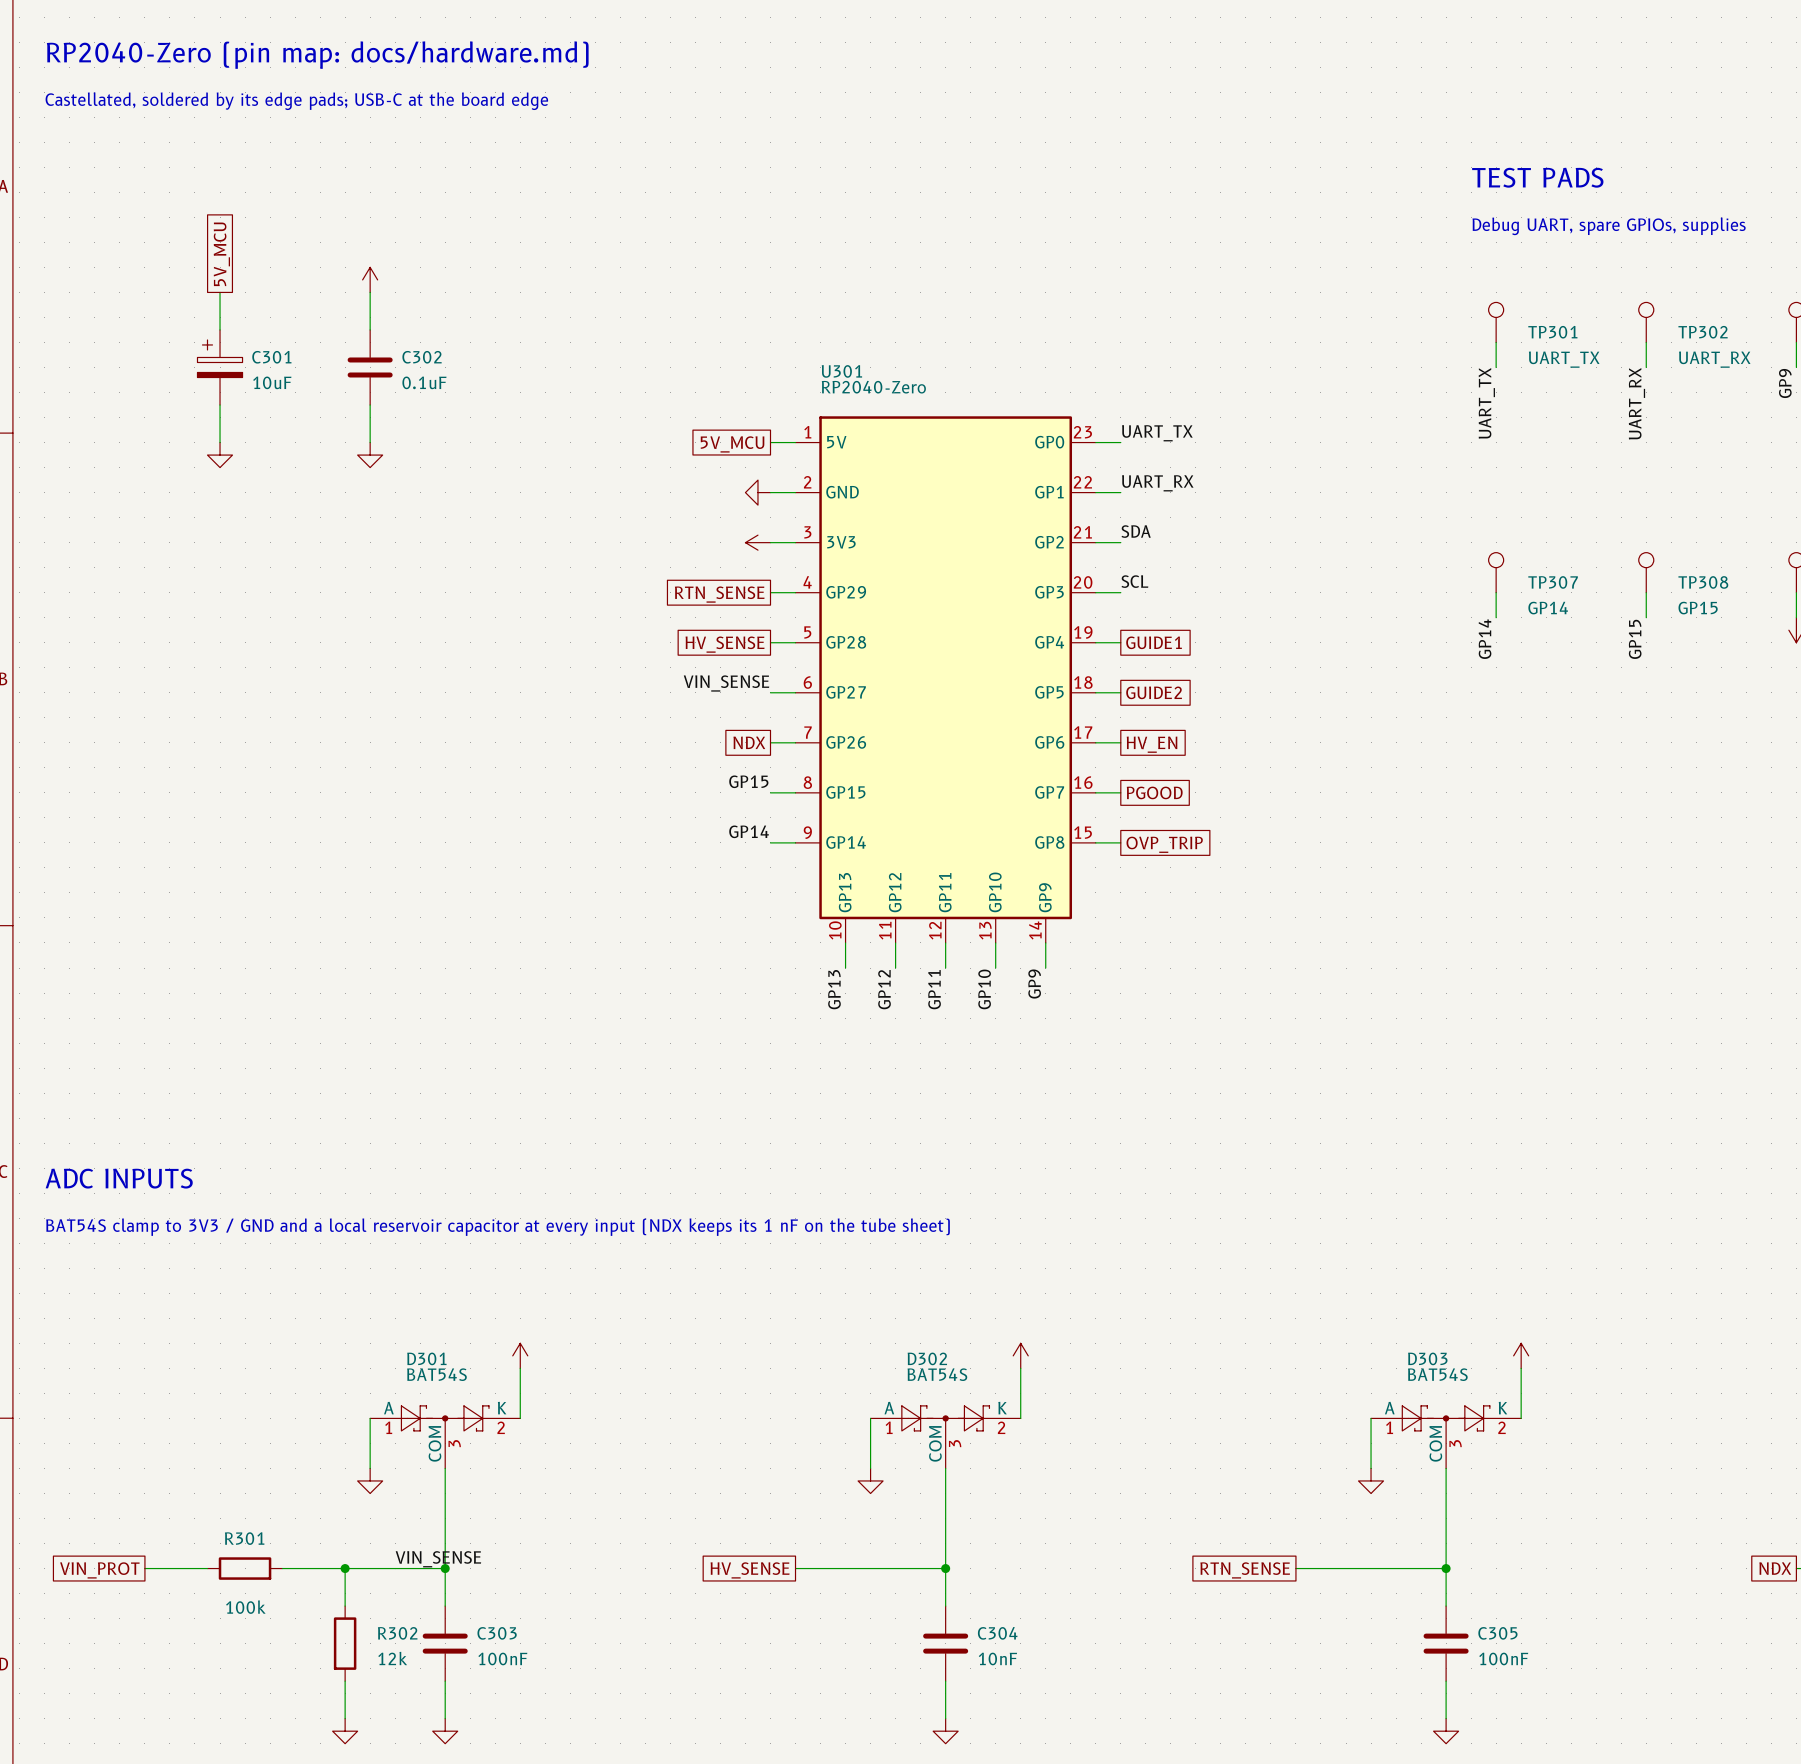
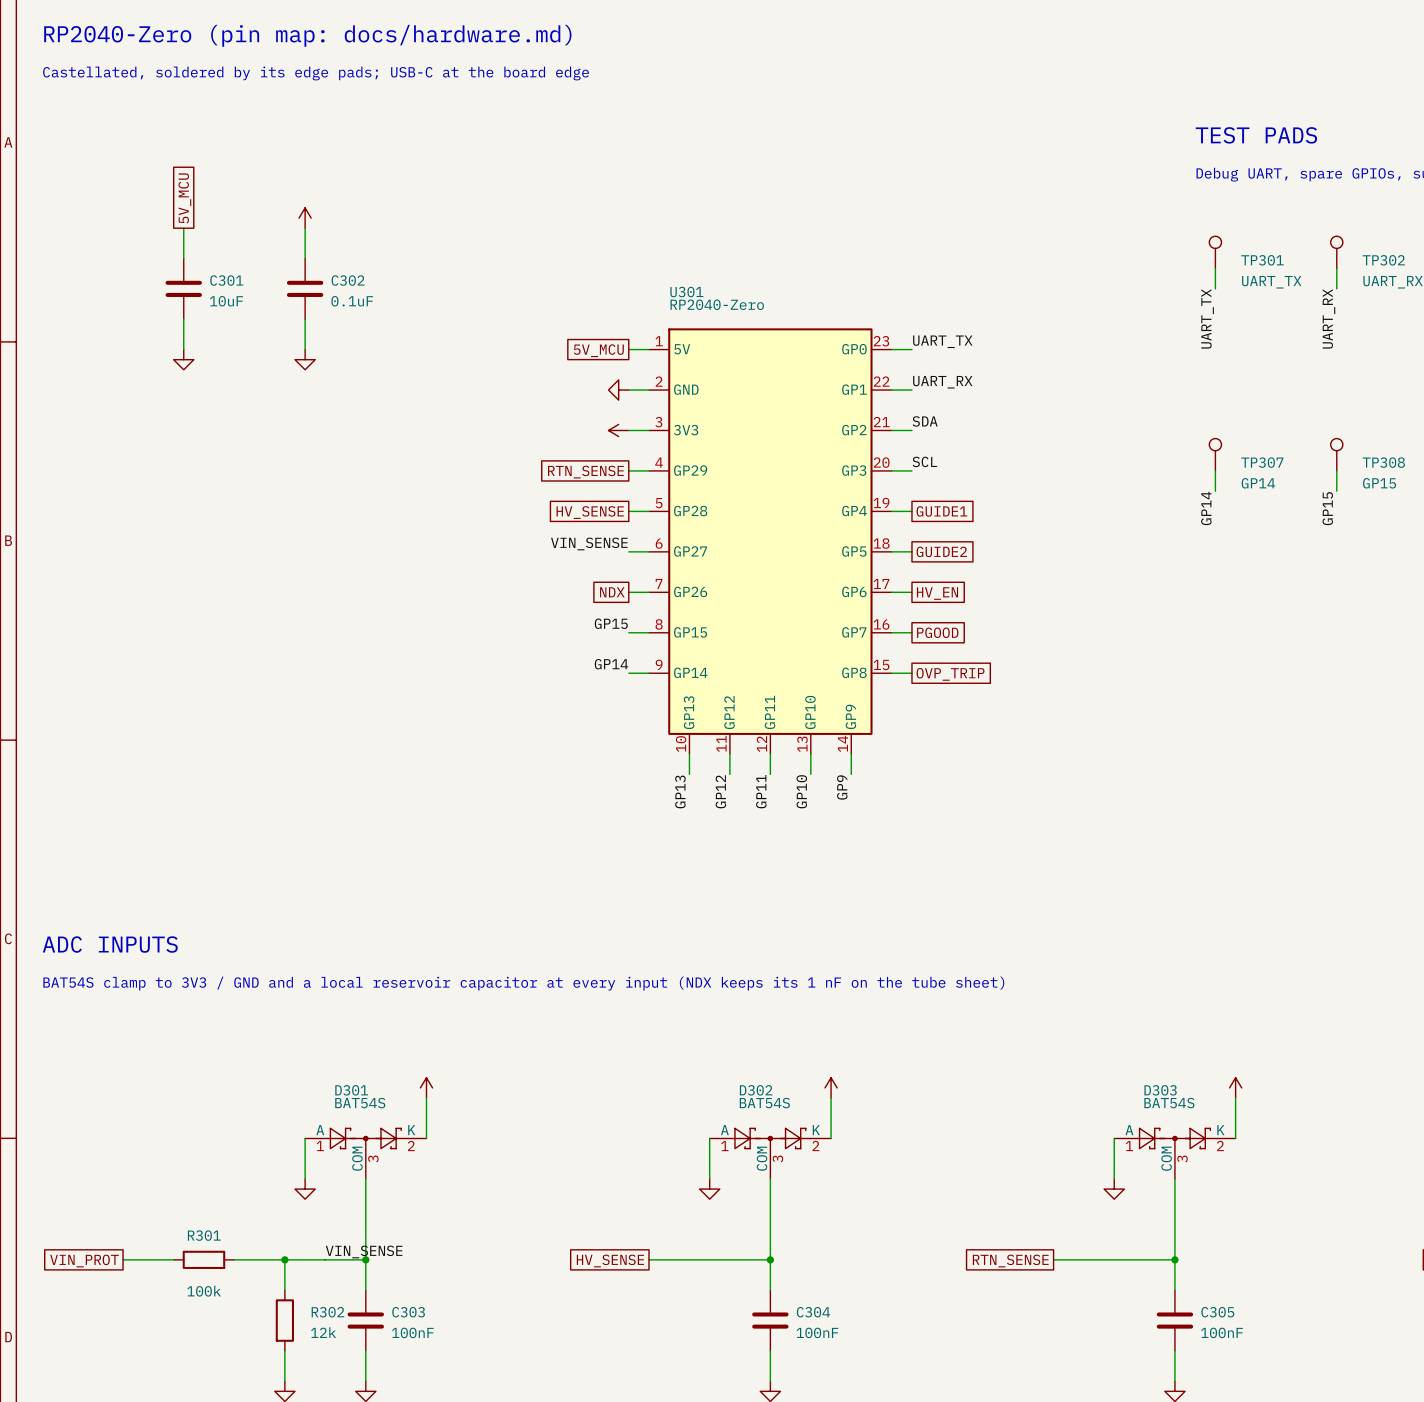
C301 symbol: [197, 329, 243, 406] -> [165, 258, 202, 320]
C304 value: 10nF (997, 1658) -> 100nF (817, 1332)

